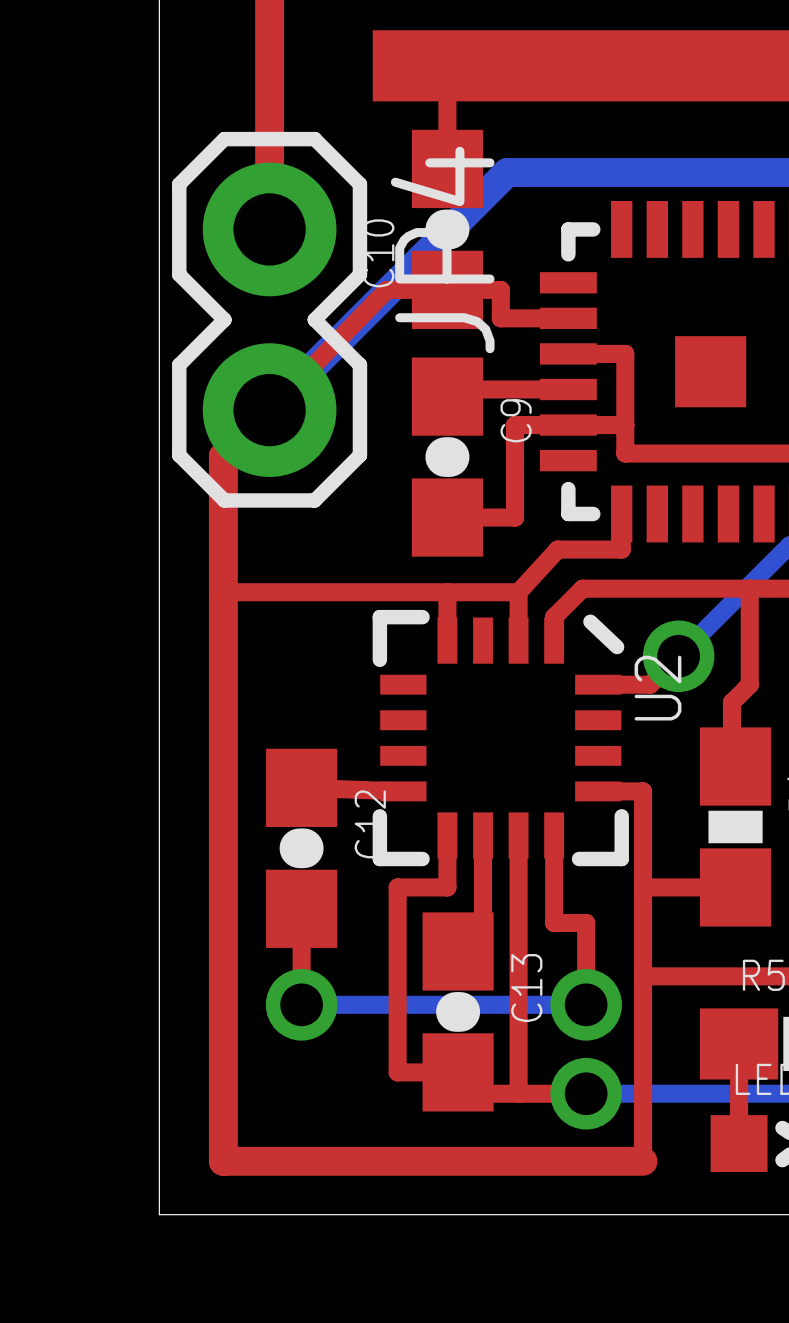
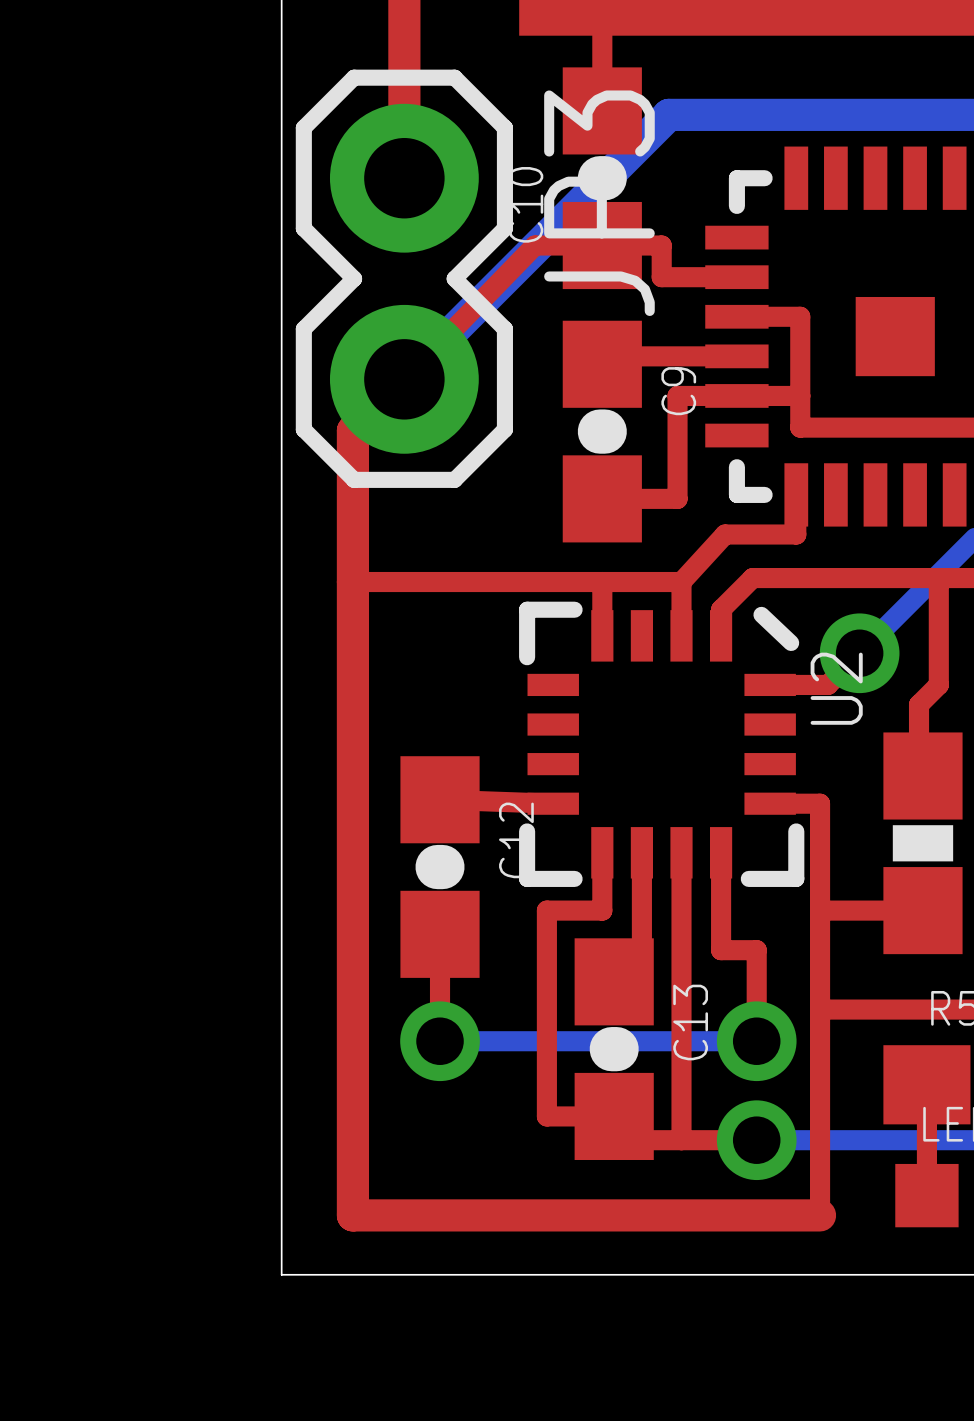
JP4 name: JP4 (442, 249) -> JP3 (599, 203)

